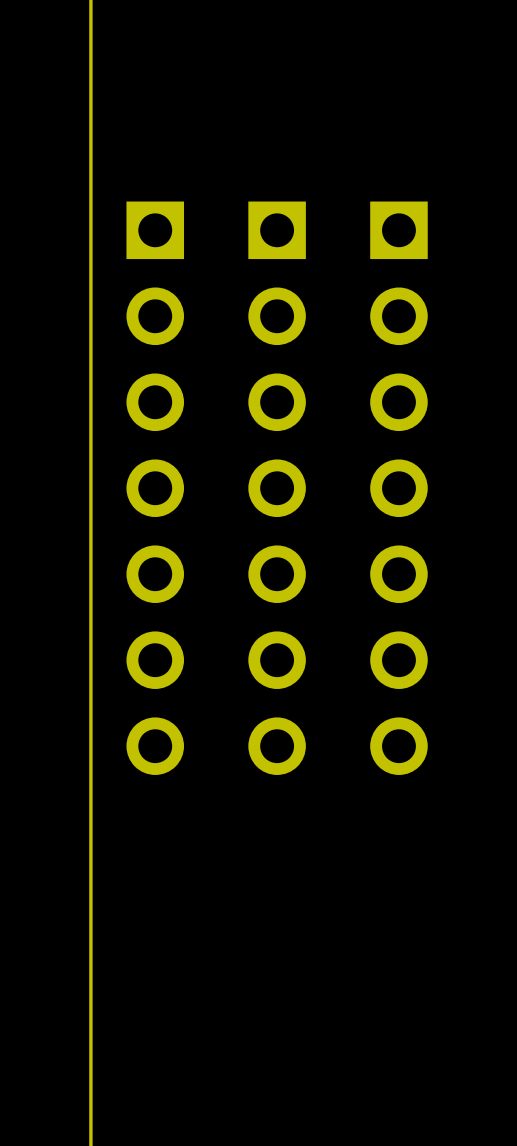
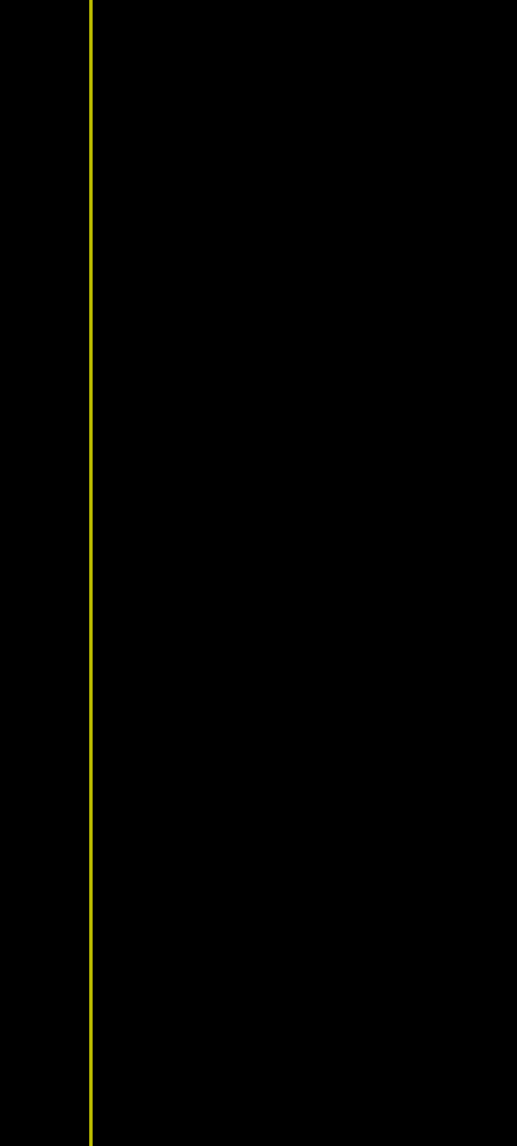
part: (155, 488) -> none
part: (277, 488) -> none
part: (398, 488) -> none

